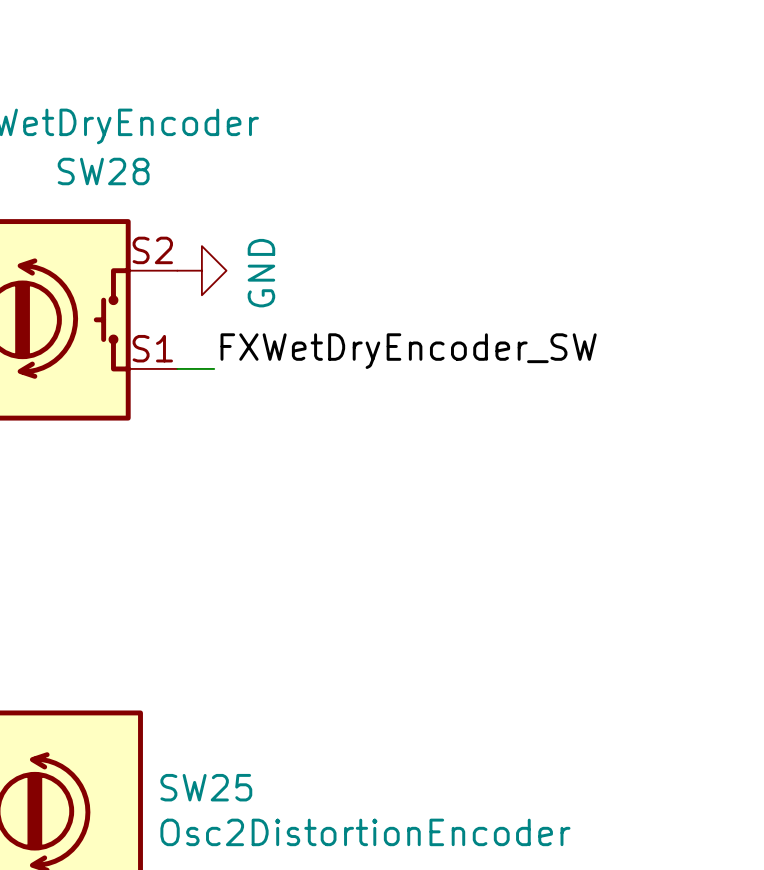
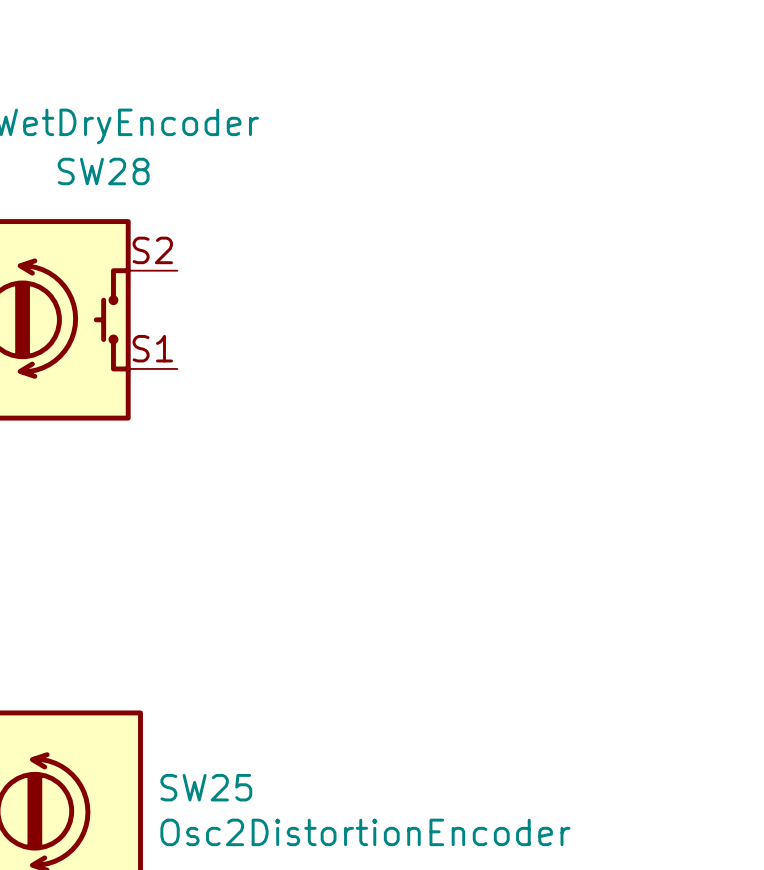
power symbol: GND (201, 270) -> none
label: FXWetDryEncoder_SW (408, 351) -> none
wire: (177, 368) (214, 368) -> none

